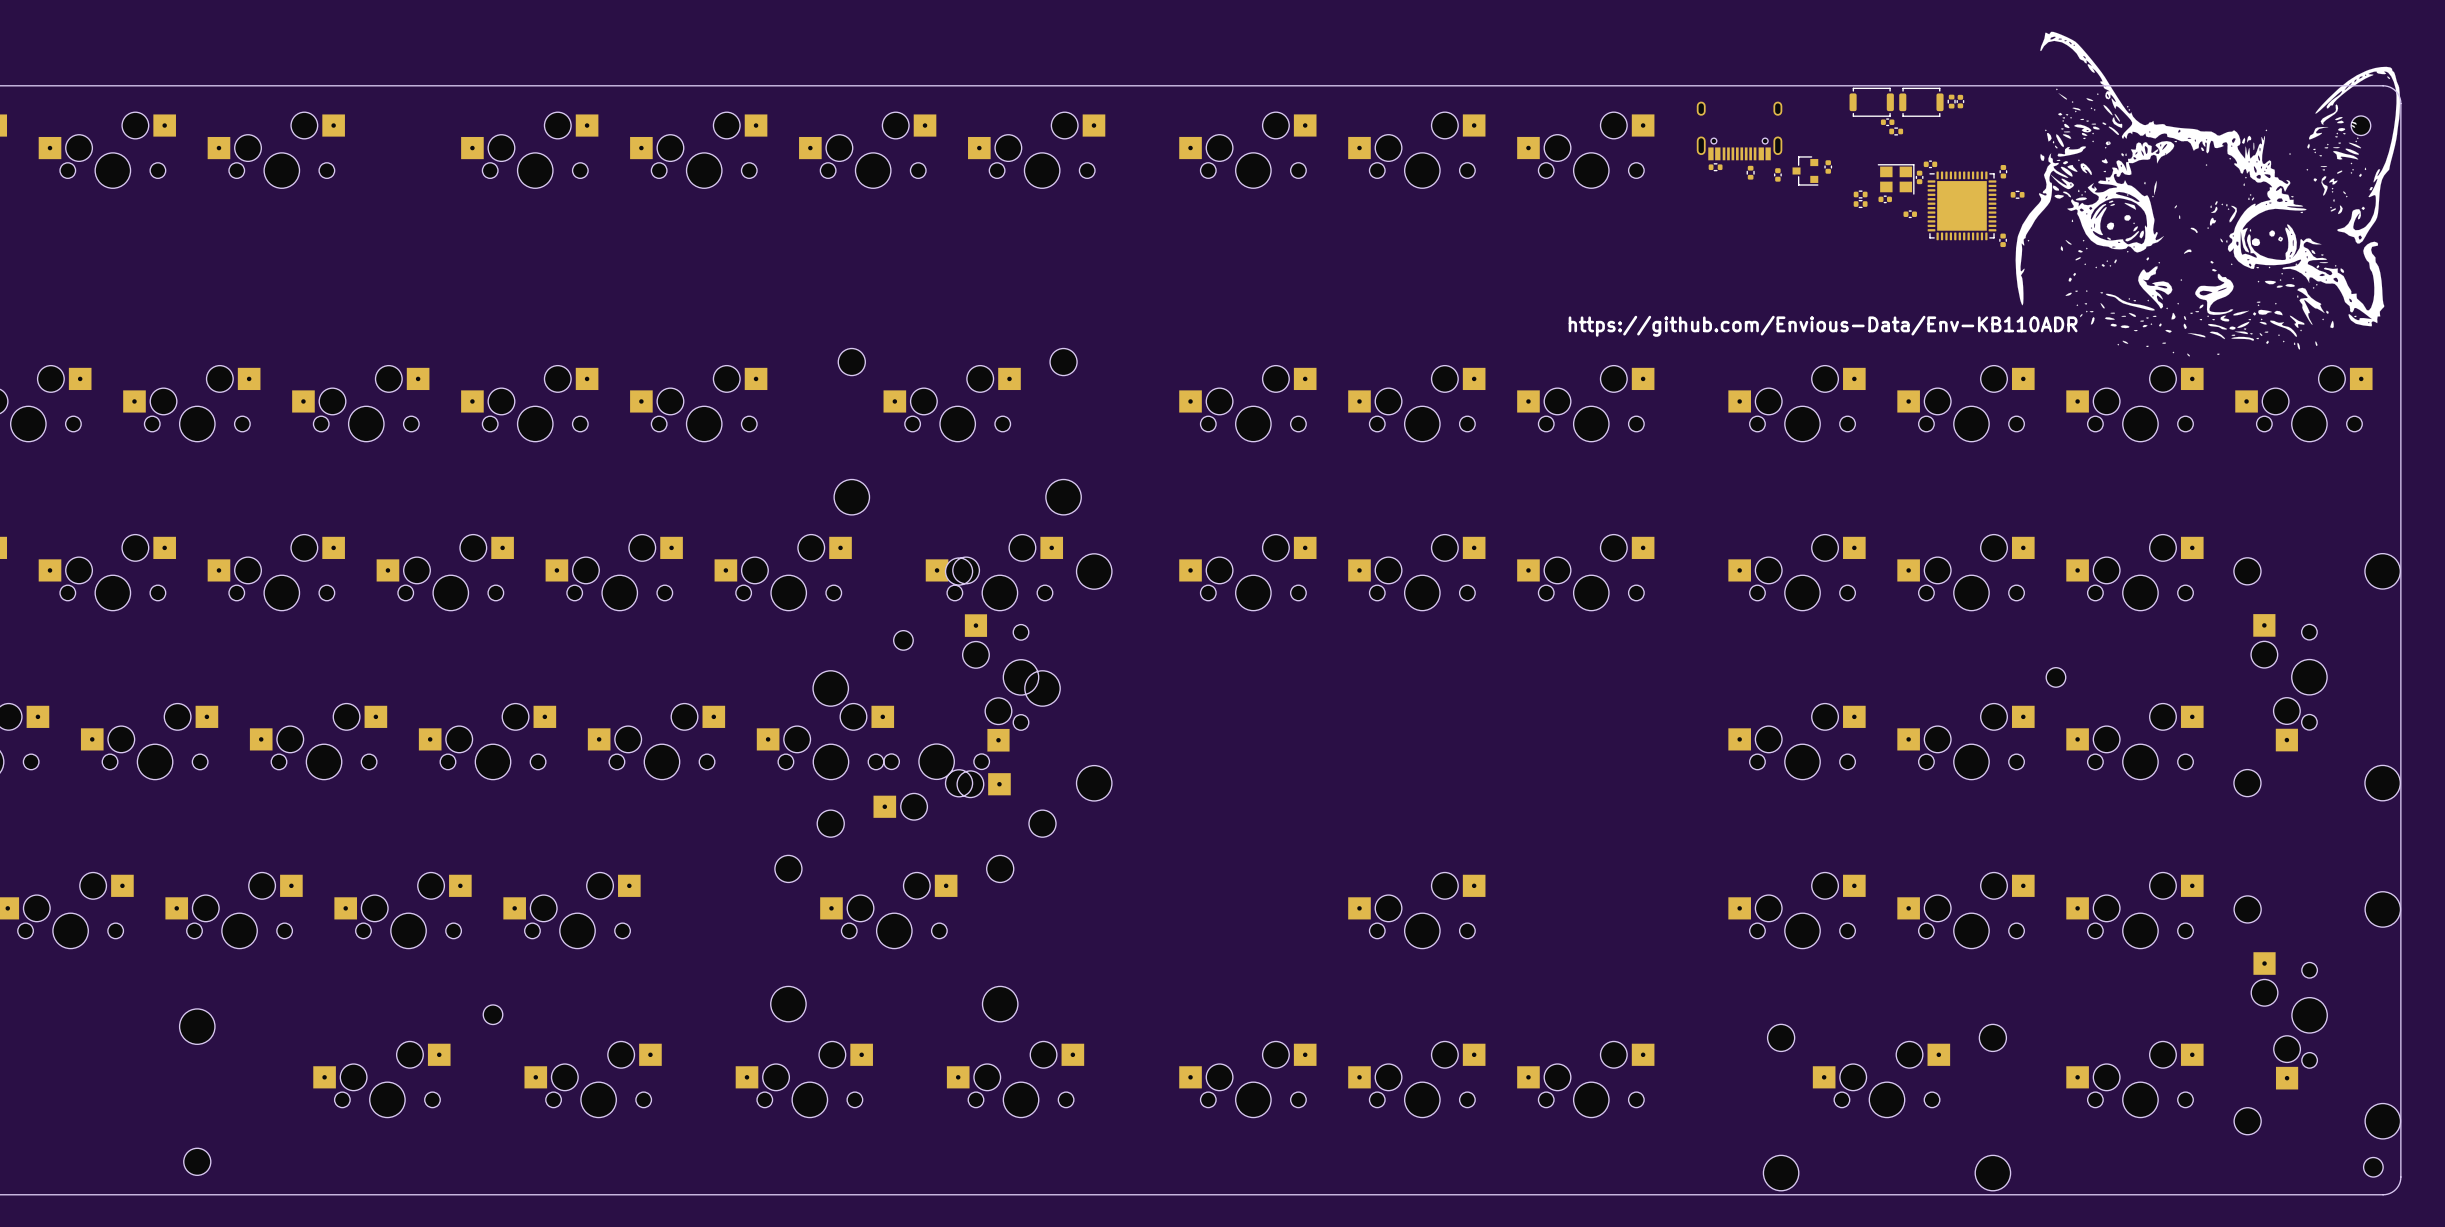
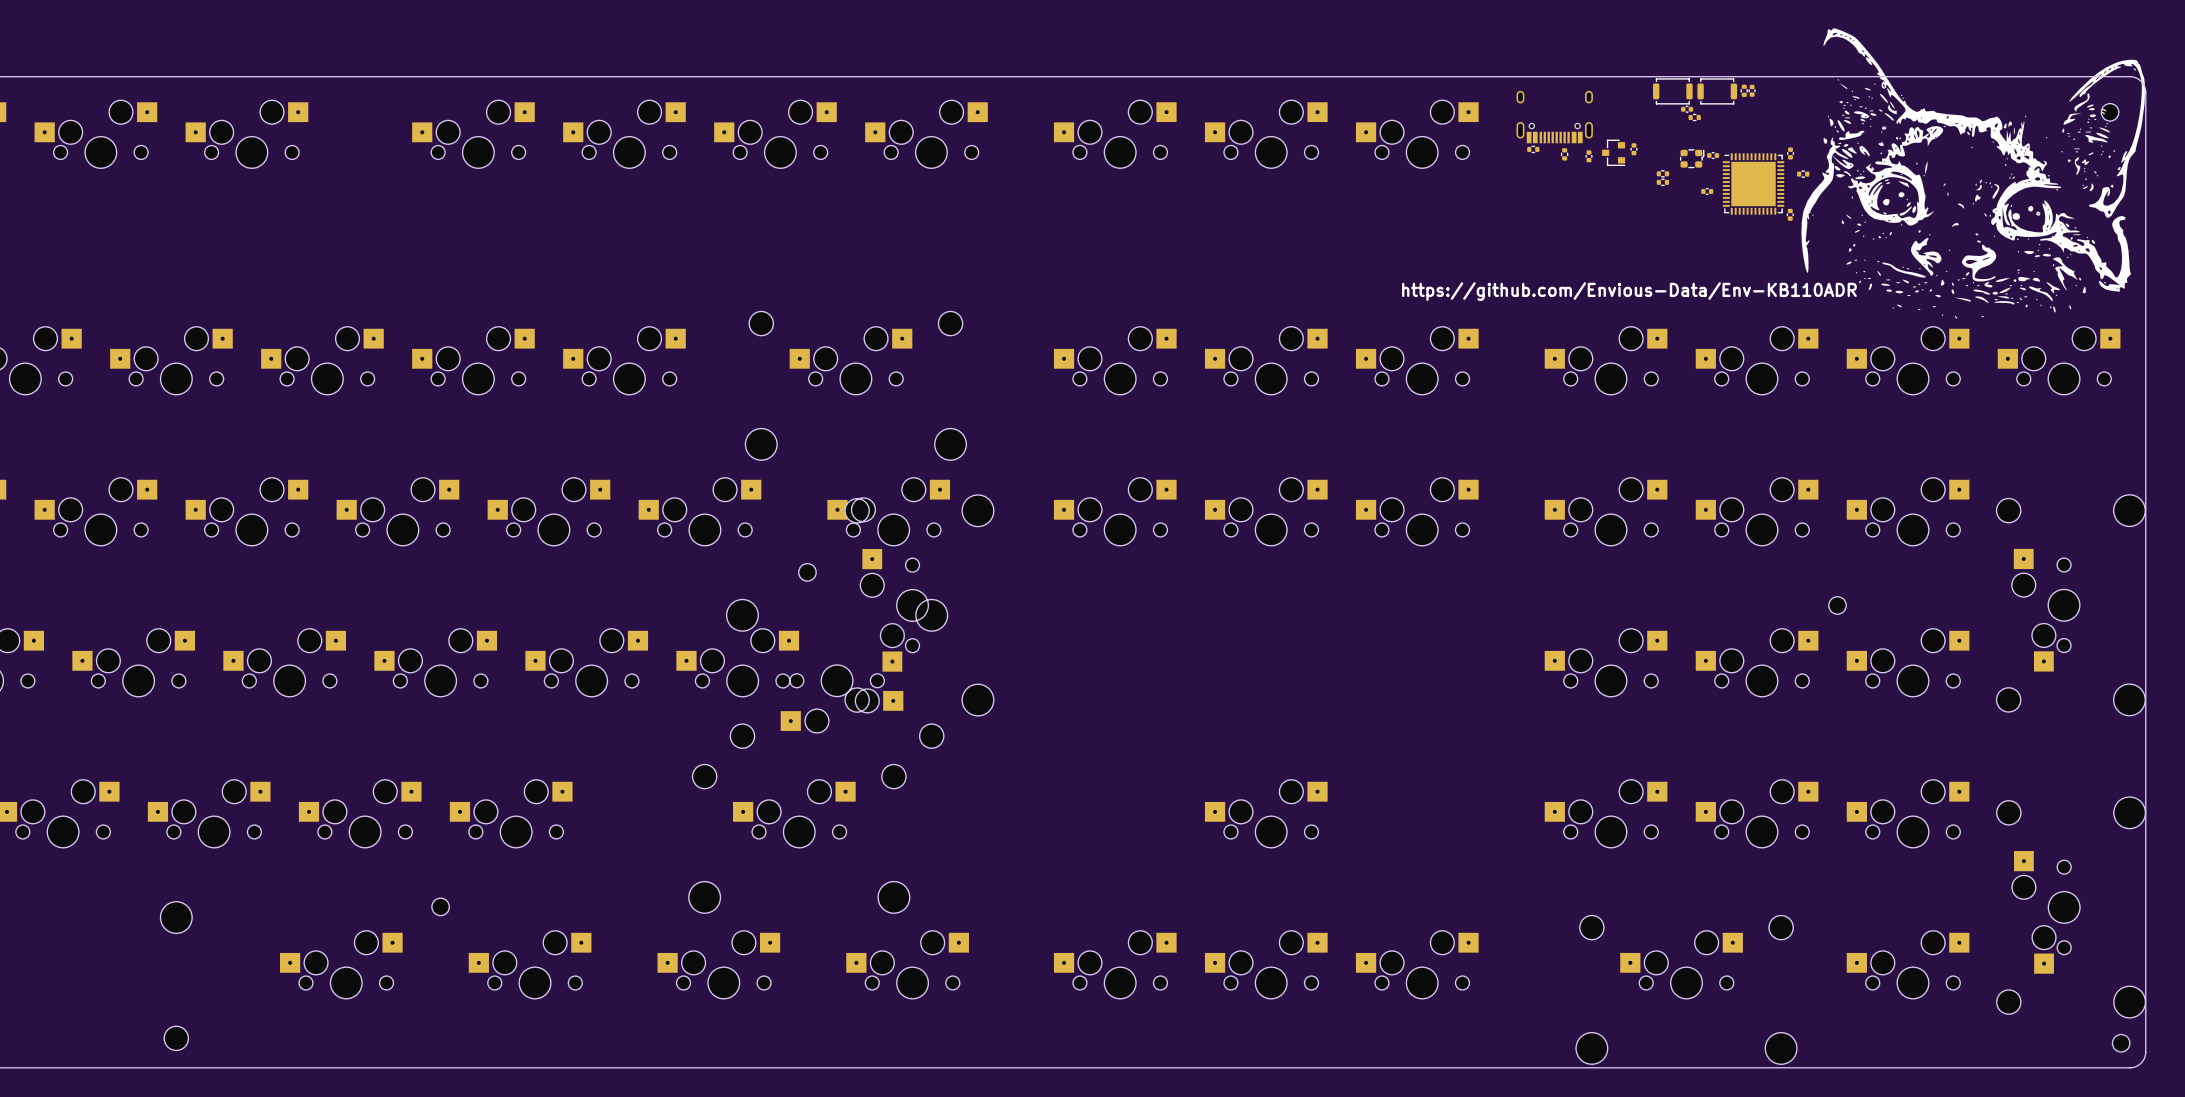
part footprint: [1877, 164, 1915, 195] -> [1680, 149, 1705, 169]
part: (1930, 164) -> none
part rotation: 0° (1919, 177) -> 90° clockwise (1713, 155)
part: (1885, 199) -> none

